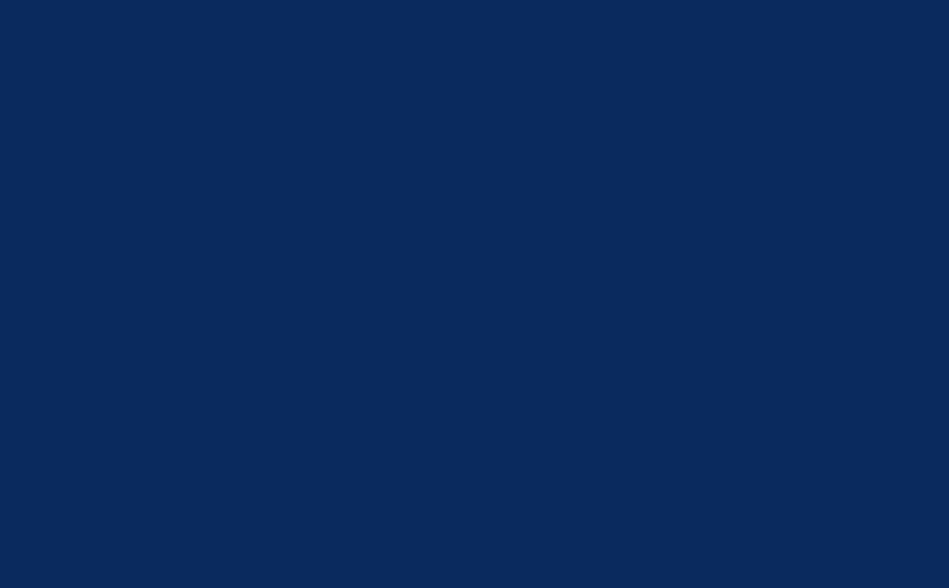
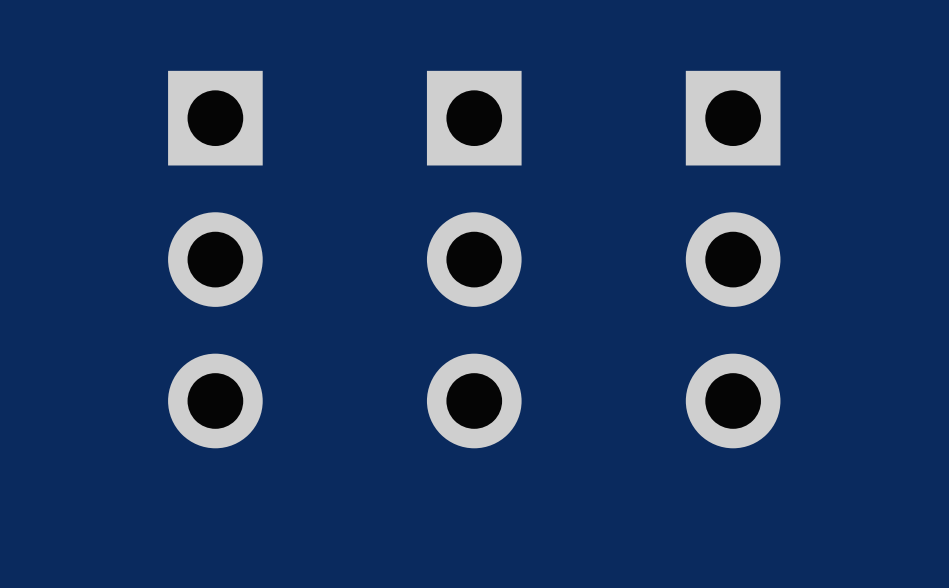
part: none -> (215, 259)
part: none -> (474, 259)
part: none -> (733, 259)

